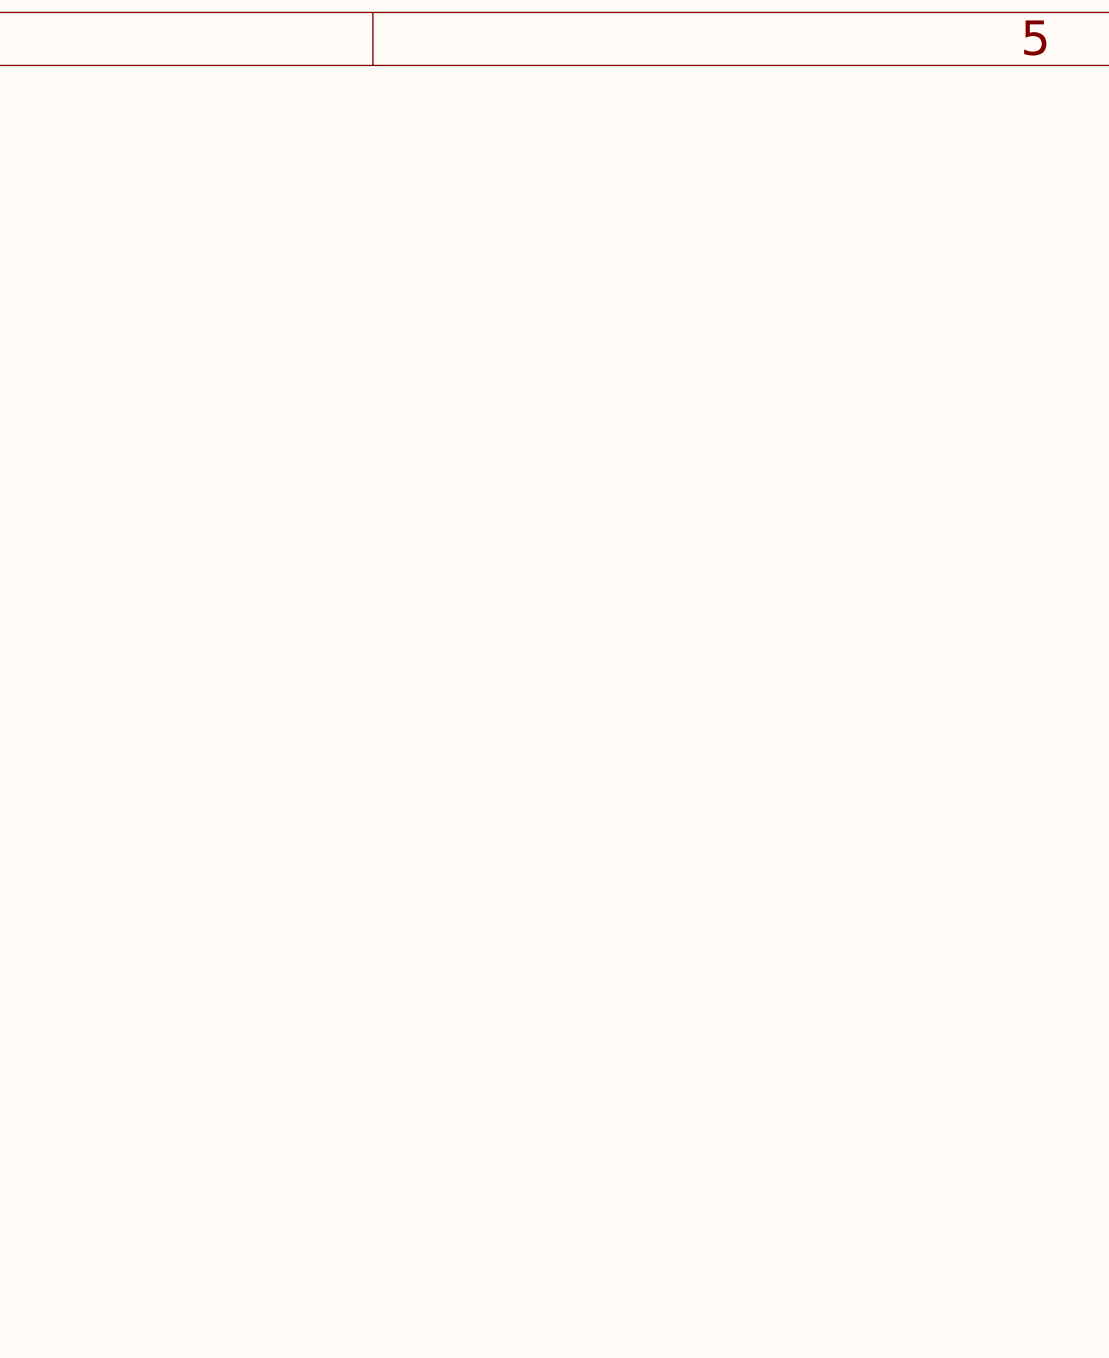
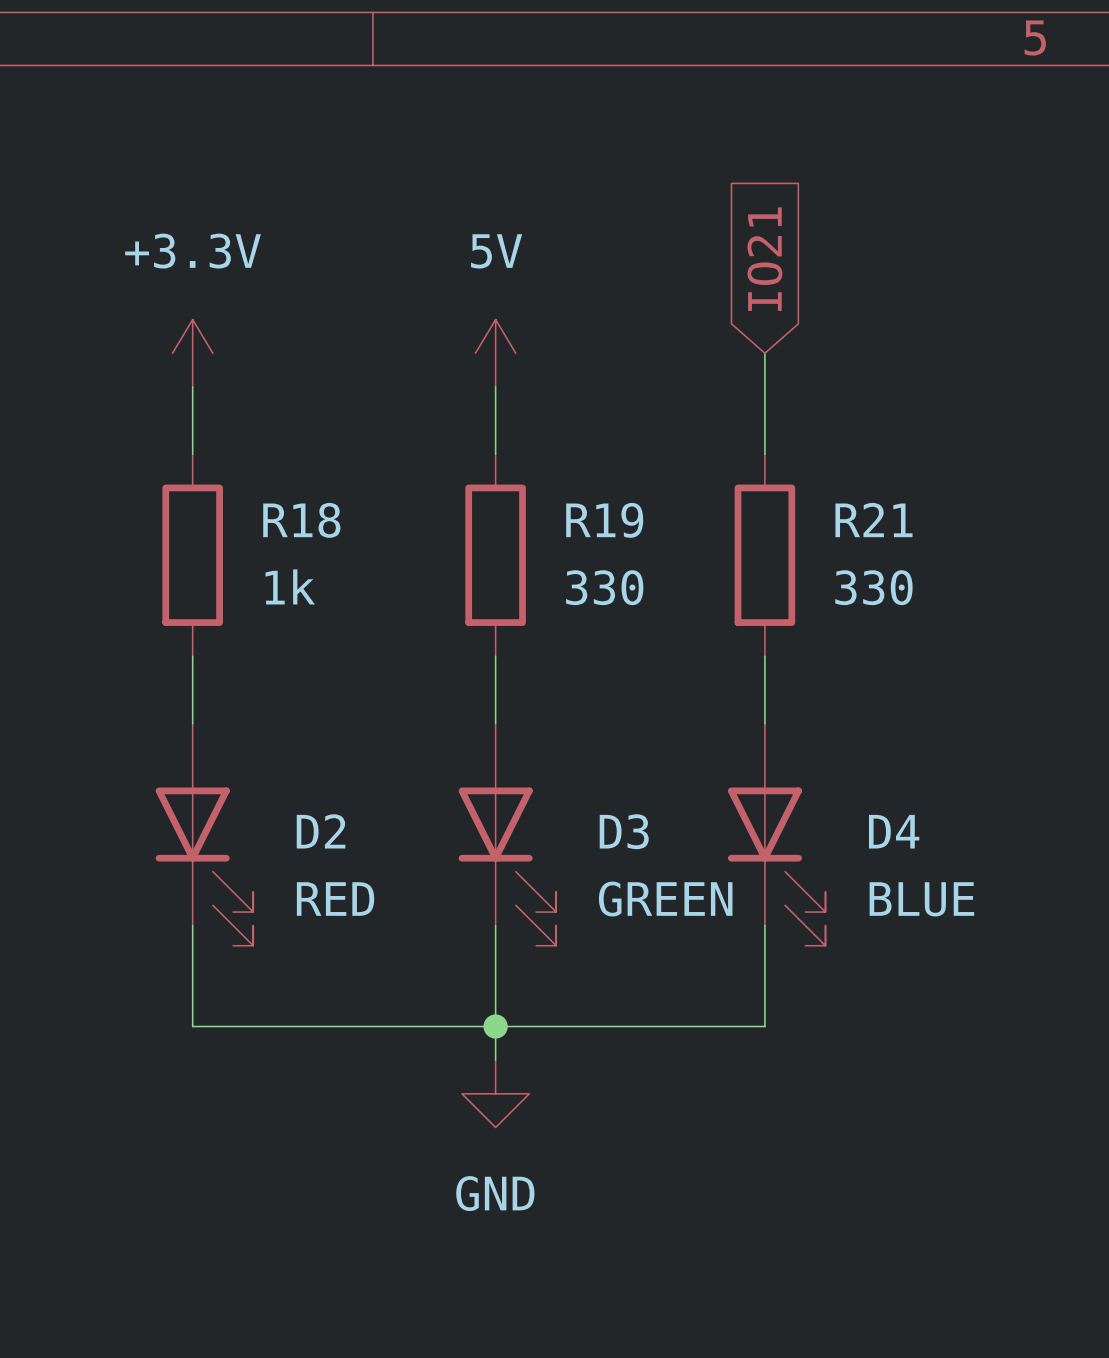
global label: none -> IO21 (764, 259)
power symbol: none -> +3.3V (192, 353)
power symbol: none -> 5V (495, 353)
wire: none -> (764, 353) (764, 454)
wire: none -> (192, 386) (192, 454)
wire: none -> (495, 386) (495, 454)
R18: none -> 1k (192, 555)
R19: none -> 330 (495, 555)
R21: none -> 330 (764, 555)
wire: none -> (192, 656) (192, 723)
wire: none -> (495, 656) (495, 723)
wire: none -> (764, 656) (764, 723)
D2: none -> RED (204, 834)
D3: none -> GREEN (507, 834)
D4: none -> BLUE (776, 834)
wire: none -> (192, 925) (192, 1026) (764, 1026) (764, 925)
wire: none -> (495, 925) (495, 1060)
junction: none -> (495, 1026)
power symbol: none -> GND (495, 1093)

